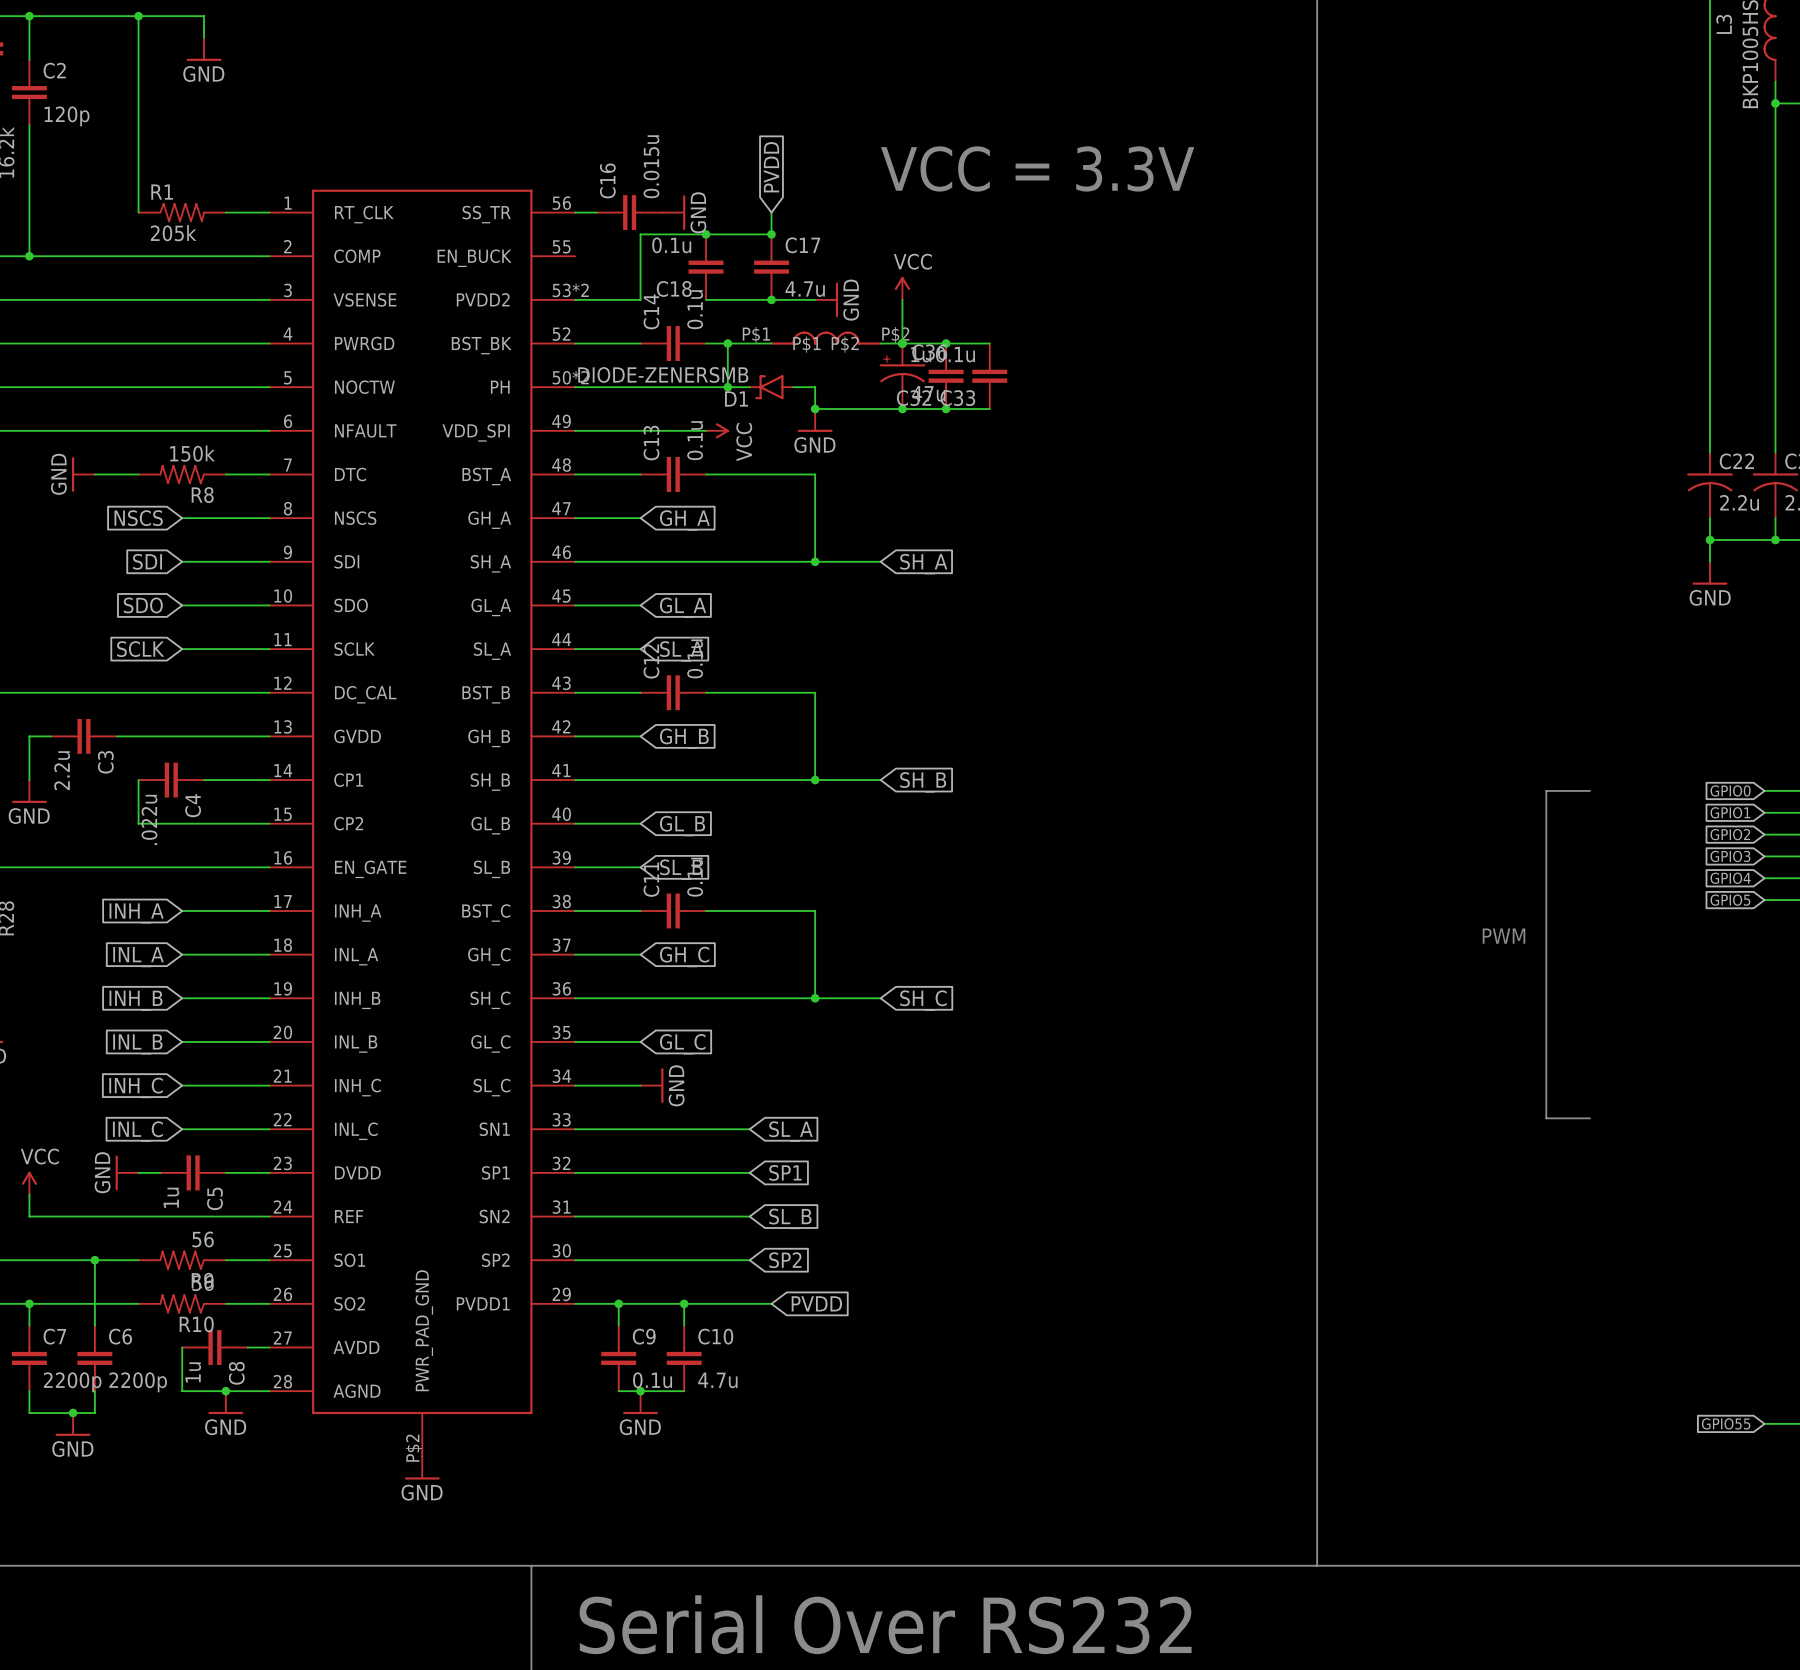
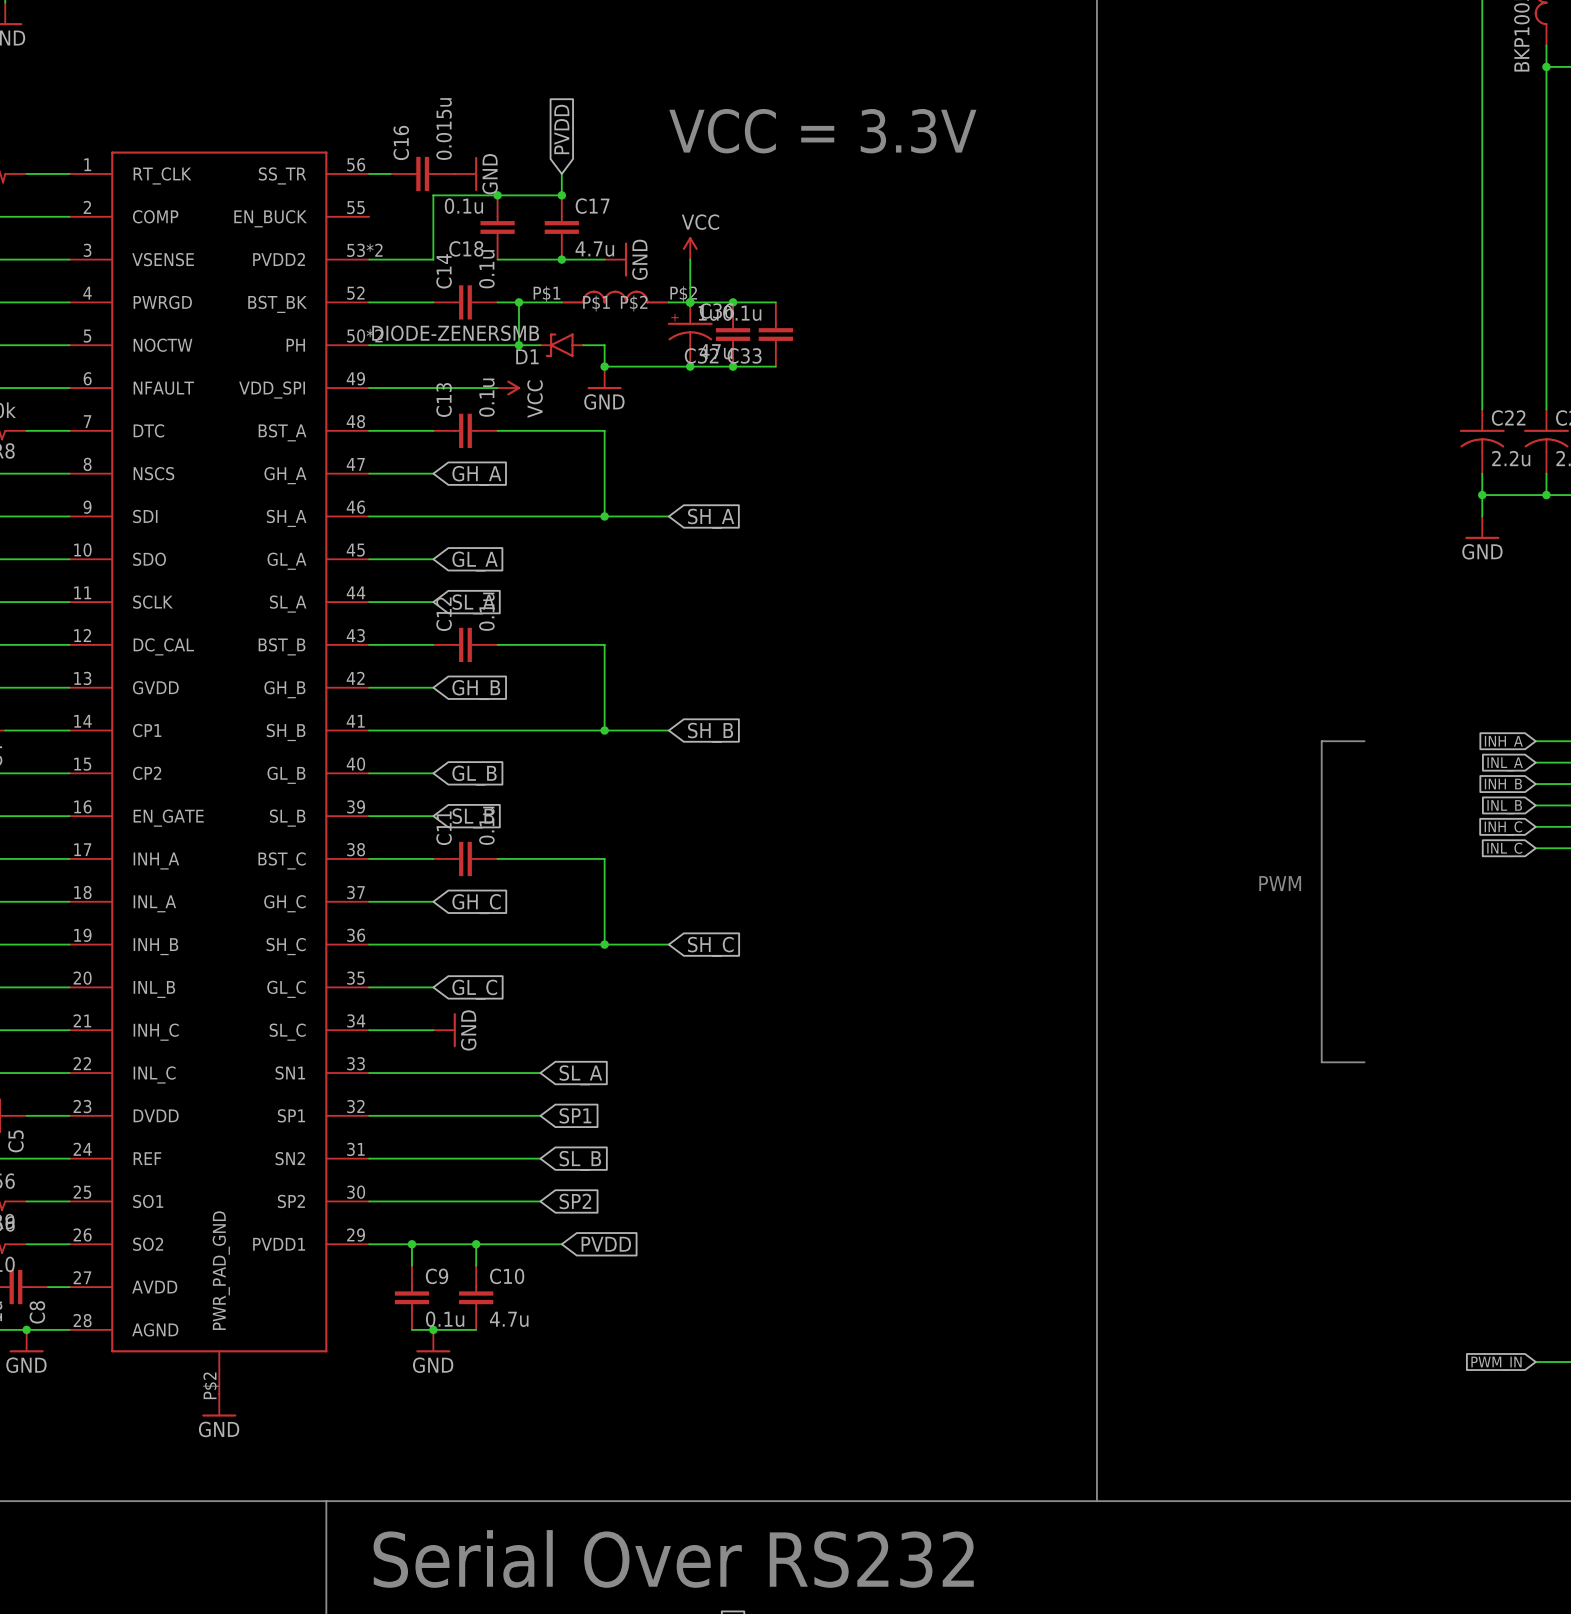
global label: GPIO0 (1730, 790) -> INH_A (1503, 742)
global label: GPIO1 (1730, 812) -> INL_A (1505, 764)
global label: GPIO2 (1730, 834) -> INH_B (1503, 785)
global label: GPIO3 (1730, 856) -> INL_B (1504, 807)
global label: GPIO4 (1730, 878) -> INH_C (1503, 828)
global label: GPIO5 (1730, 900) -> INL_C (1504, 849)
global label: GPIO55 (1726, 1423) -> PWM_IN (1496, 1363)

